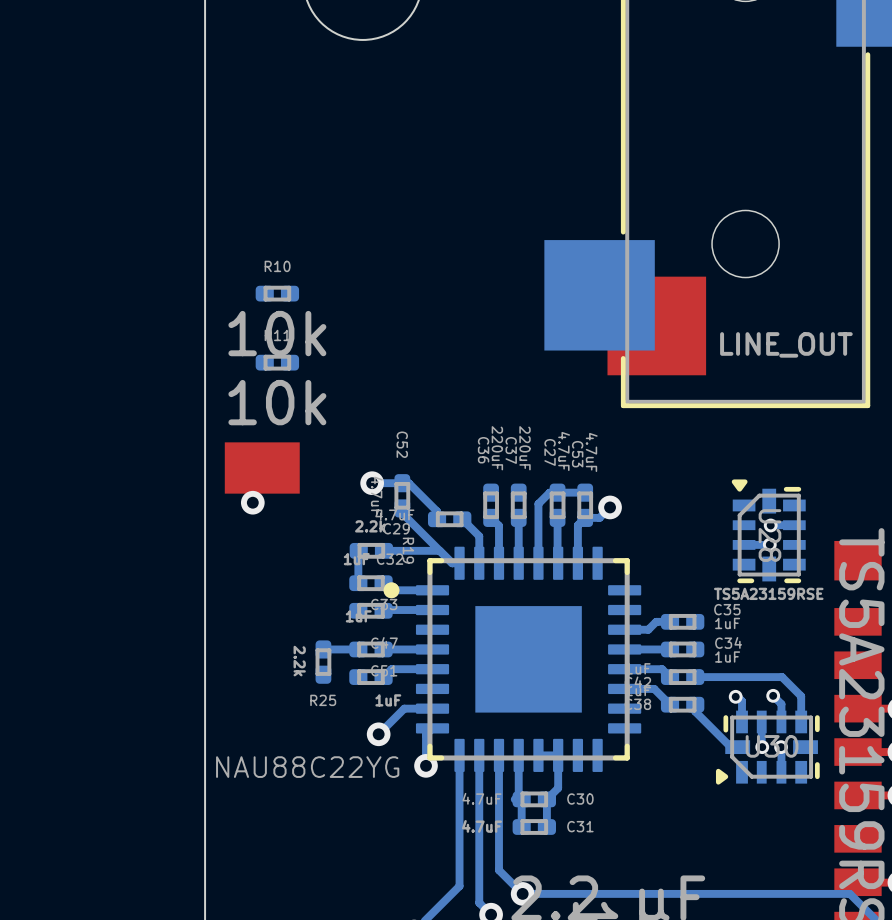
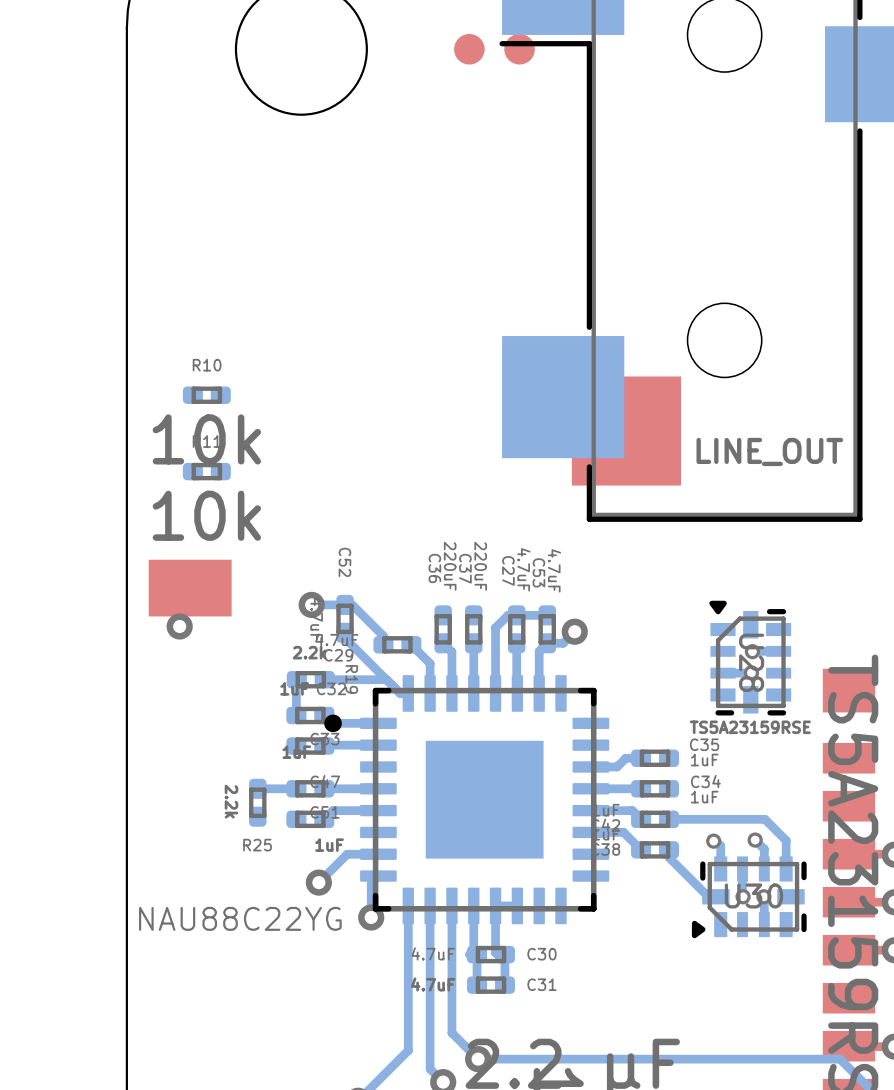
bottom track: none -> (495, 905) (495, 952) (497, 954)
bottom track: (558, 755) (558, 788) (546, 799) -> none

